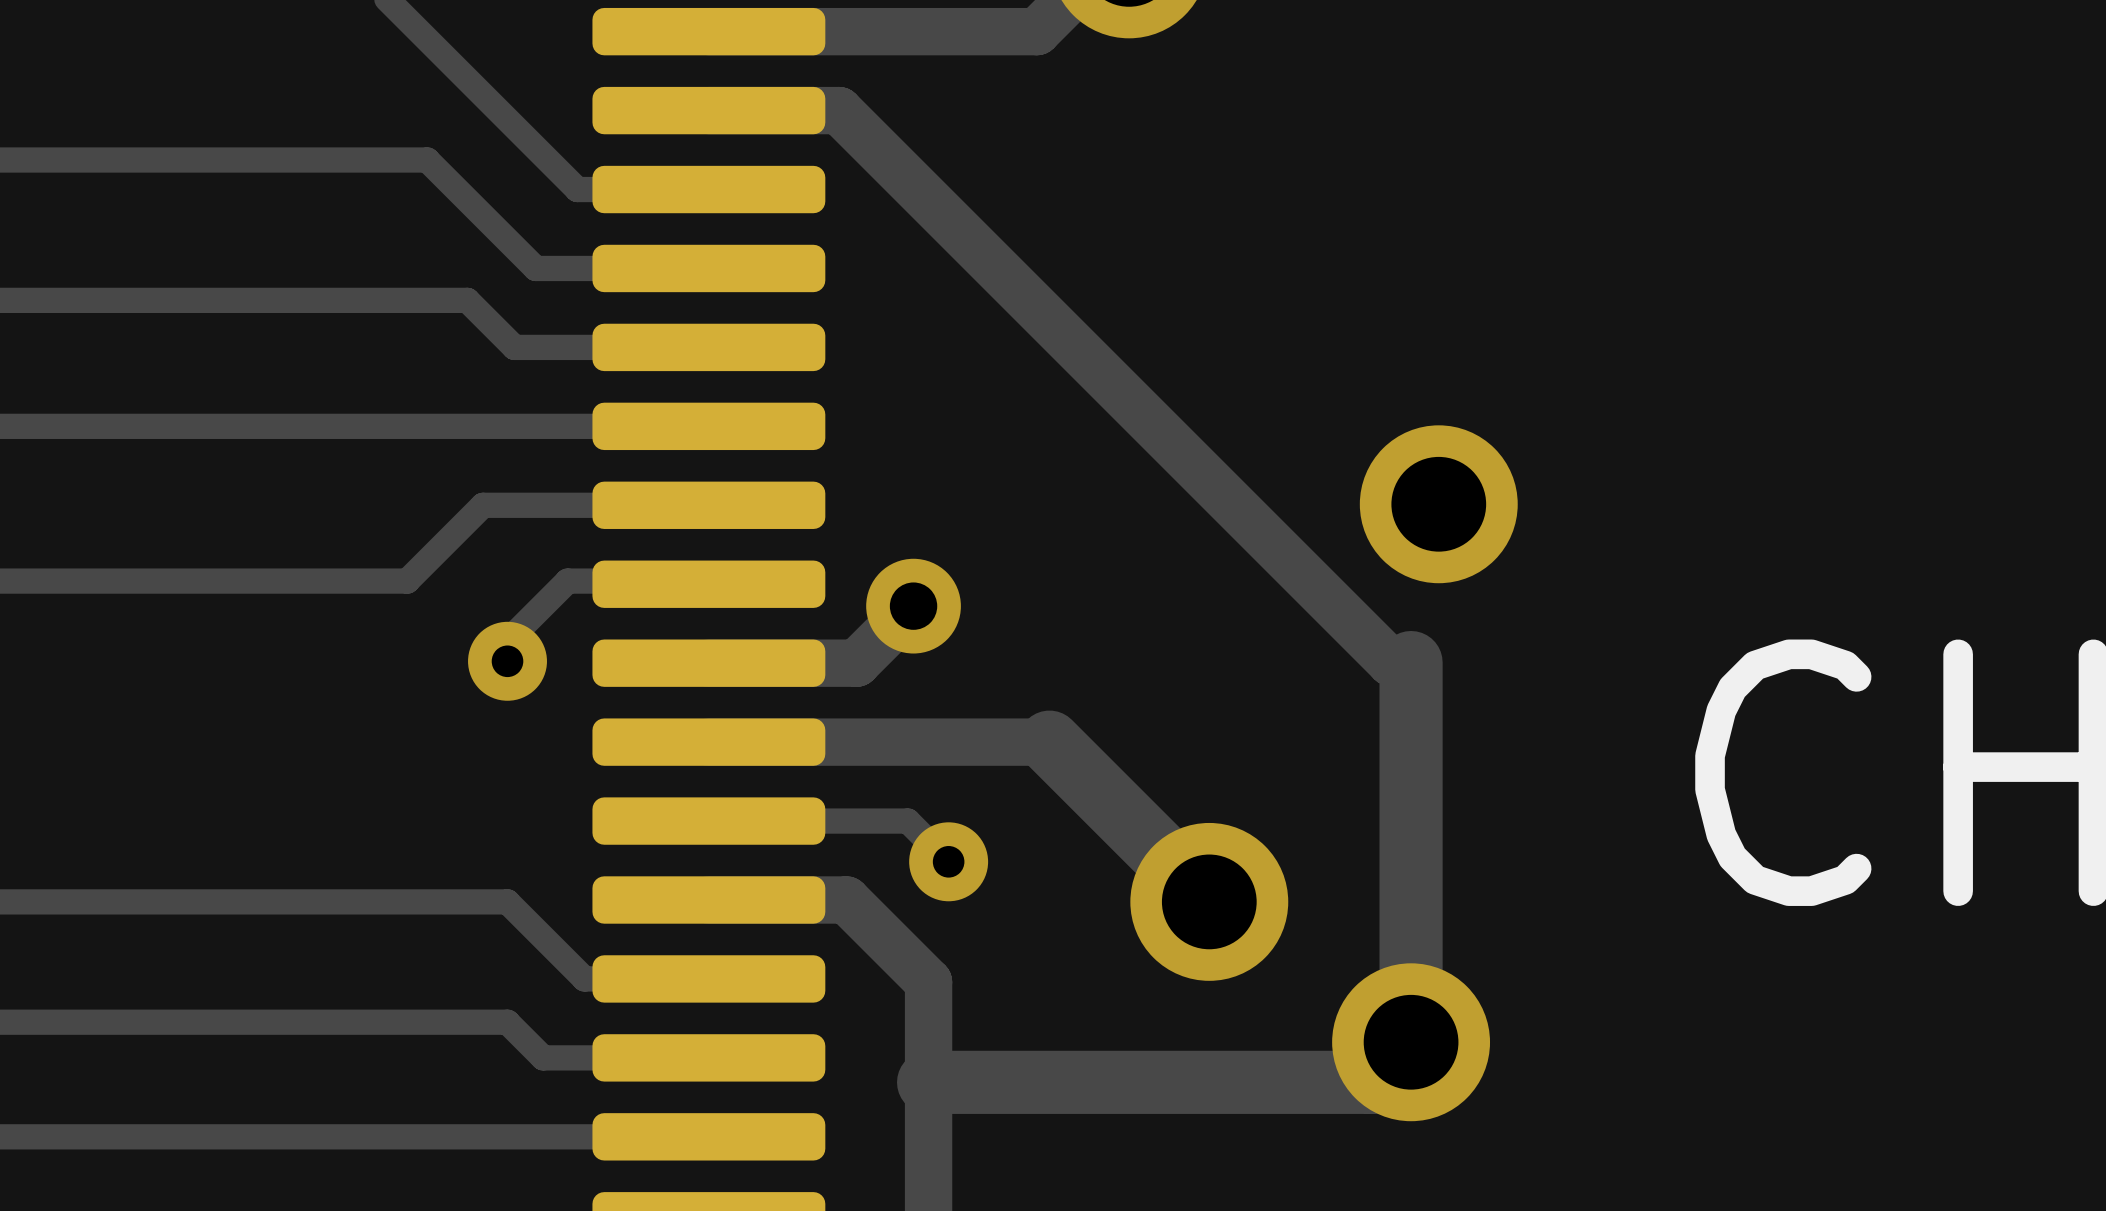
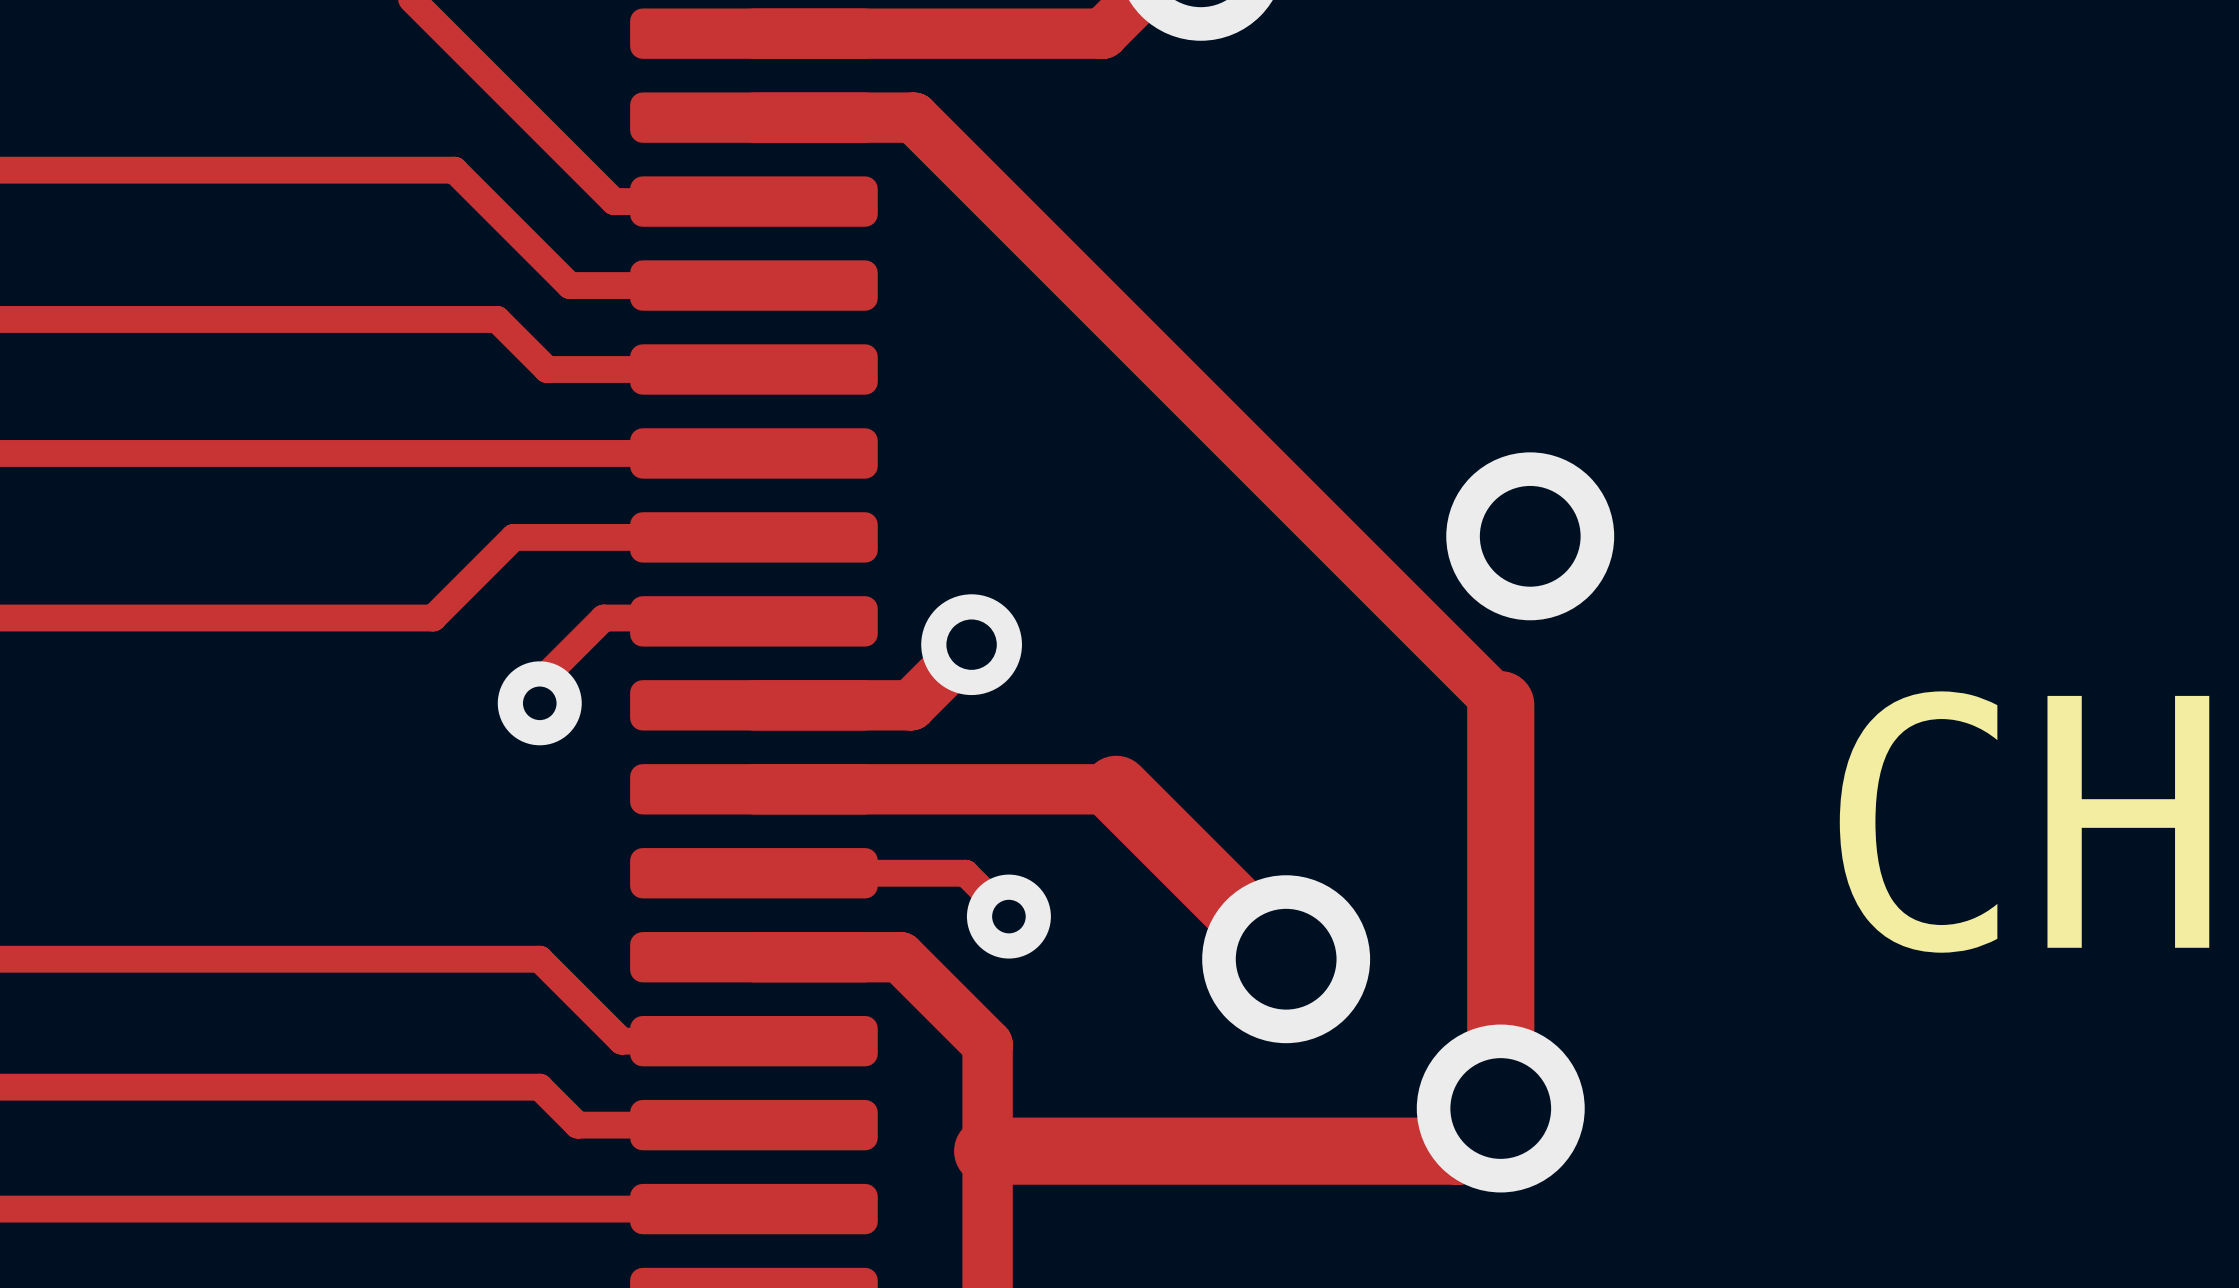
track: (839, 110) (1391, 662) (1411, 662) -> (892, 117) (913, 117) (1500, 704)

